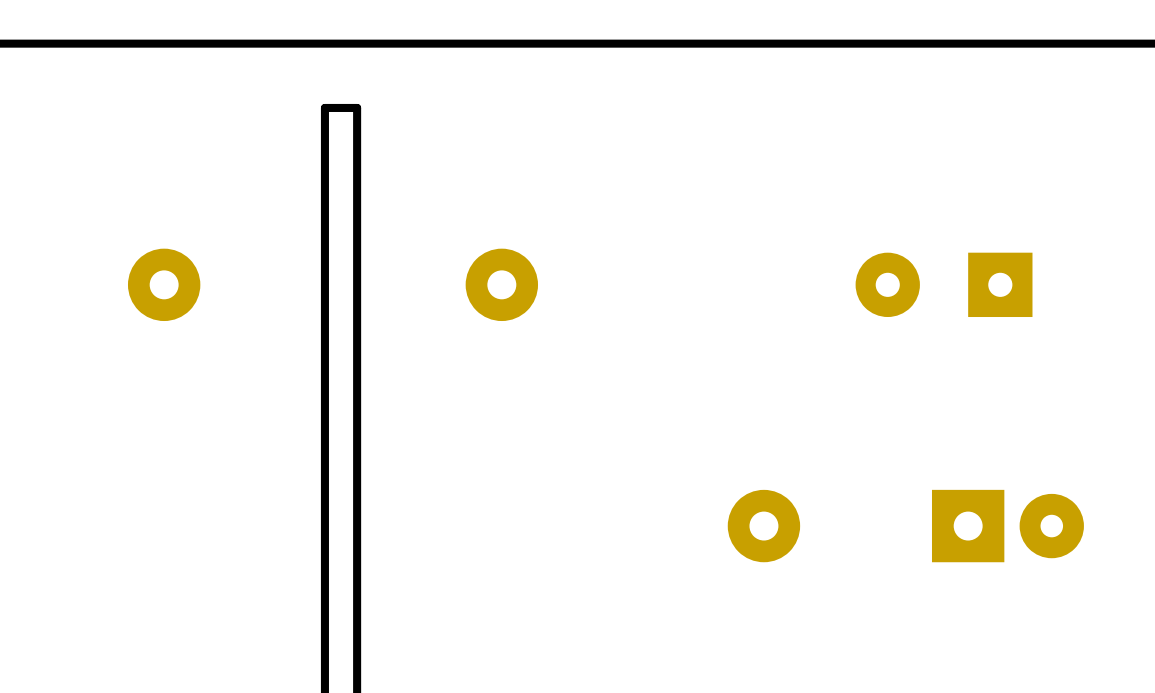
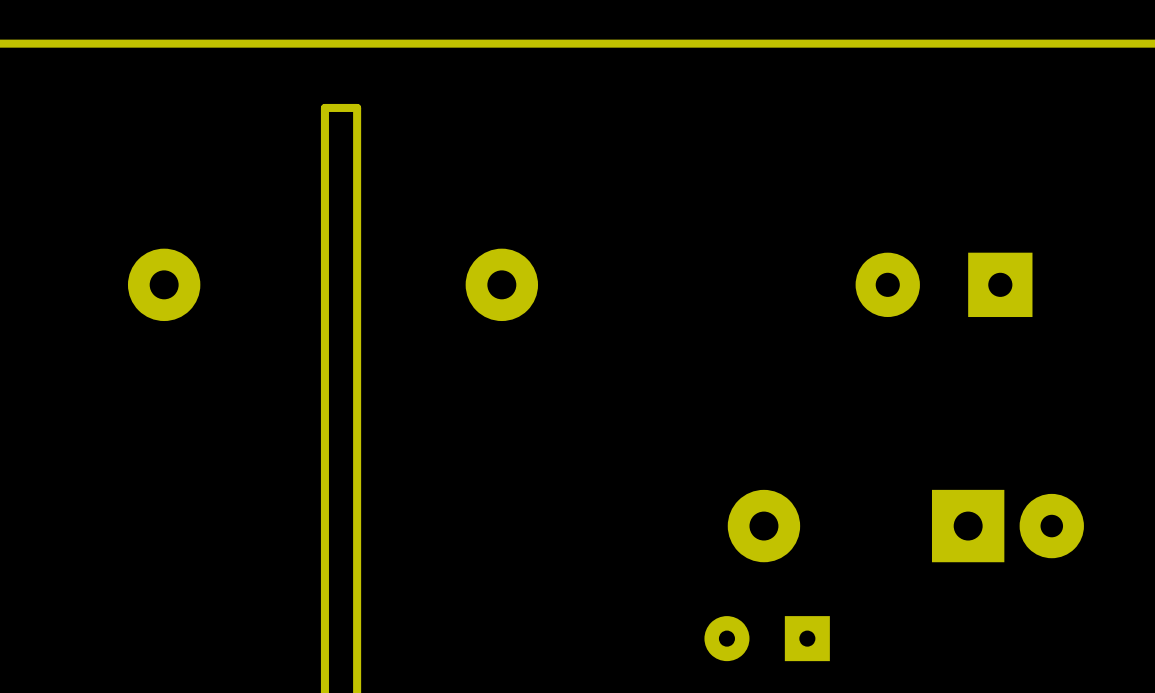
part: none -> (767, 638)

